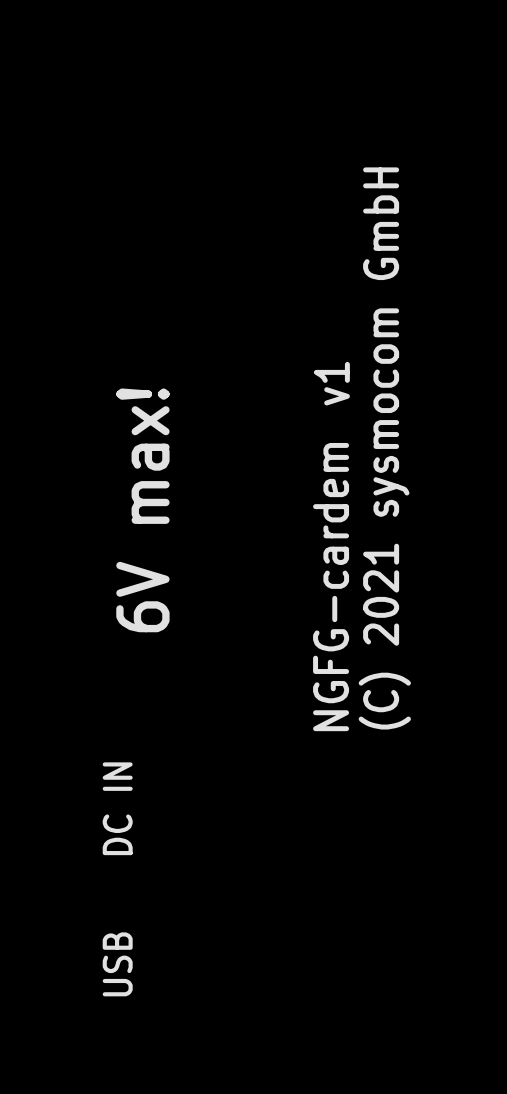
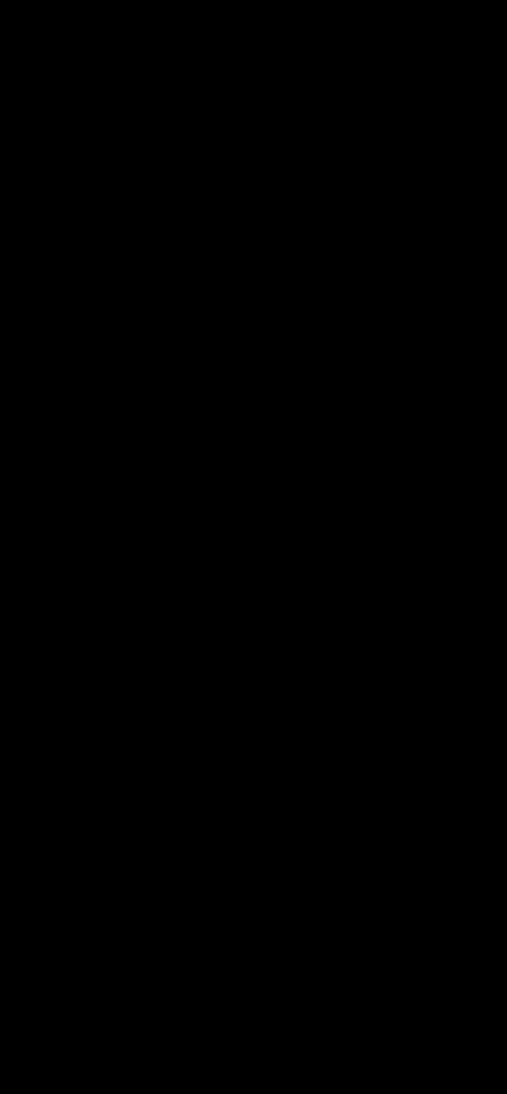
text: v1 (331, 383) -> none
text: (C) 2021 sysmocom GmbH (384, 448) -> none
text: 6V max! (142, 510) -> none
text: NGFG-cardem (331, 587) -> none
text: DC IN (117, 808) -> none
text: USB (117, 964) -> none

